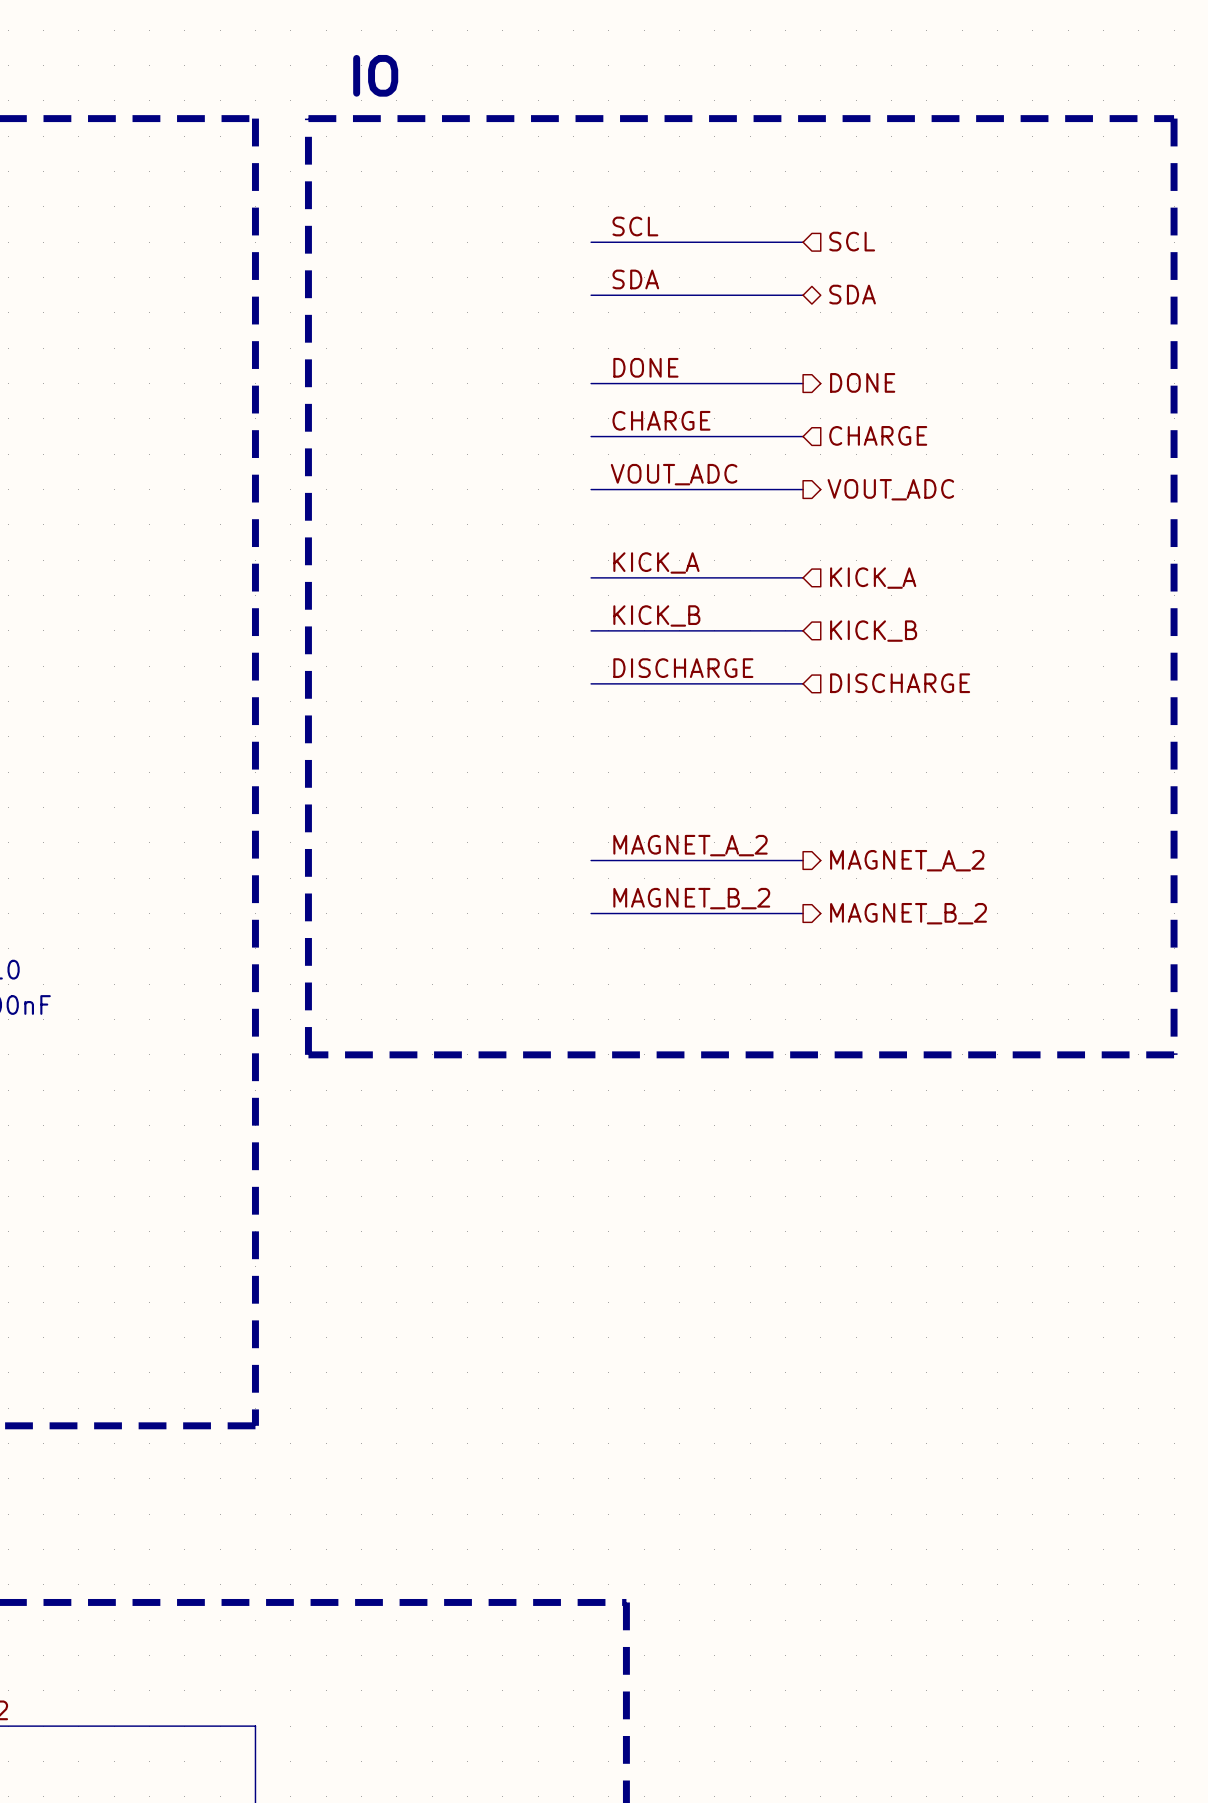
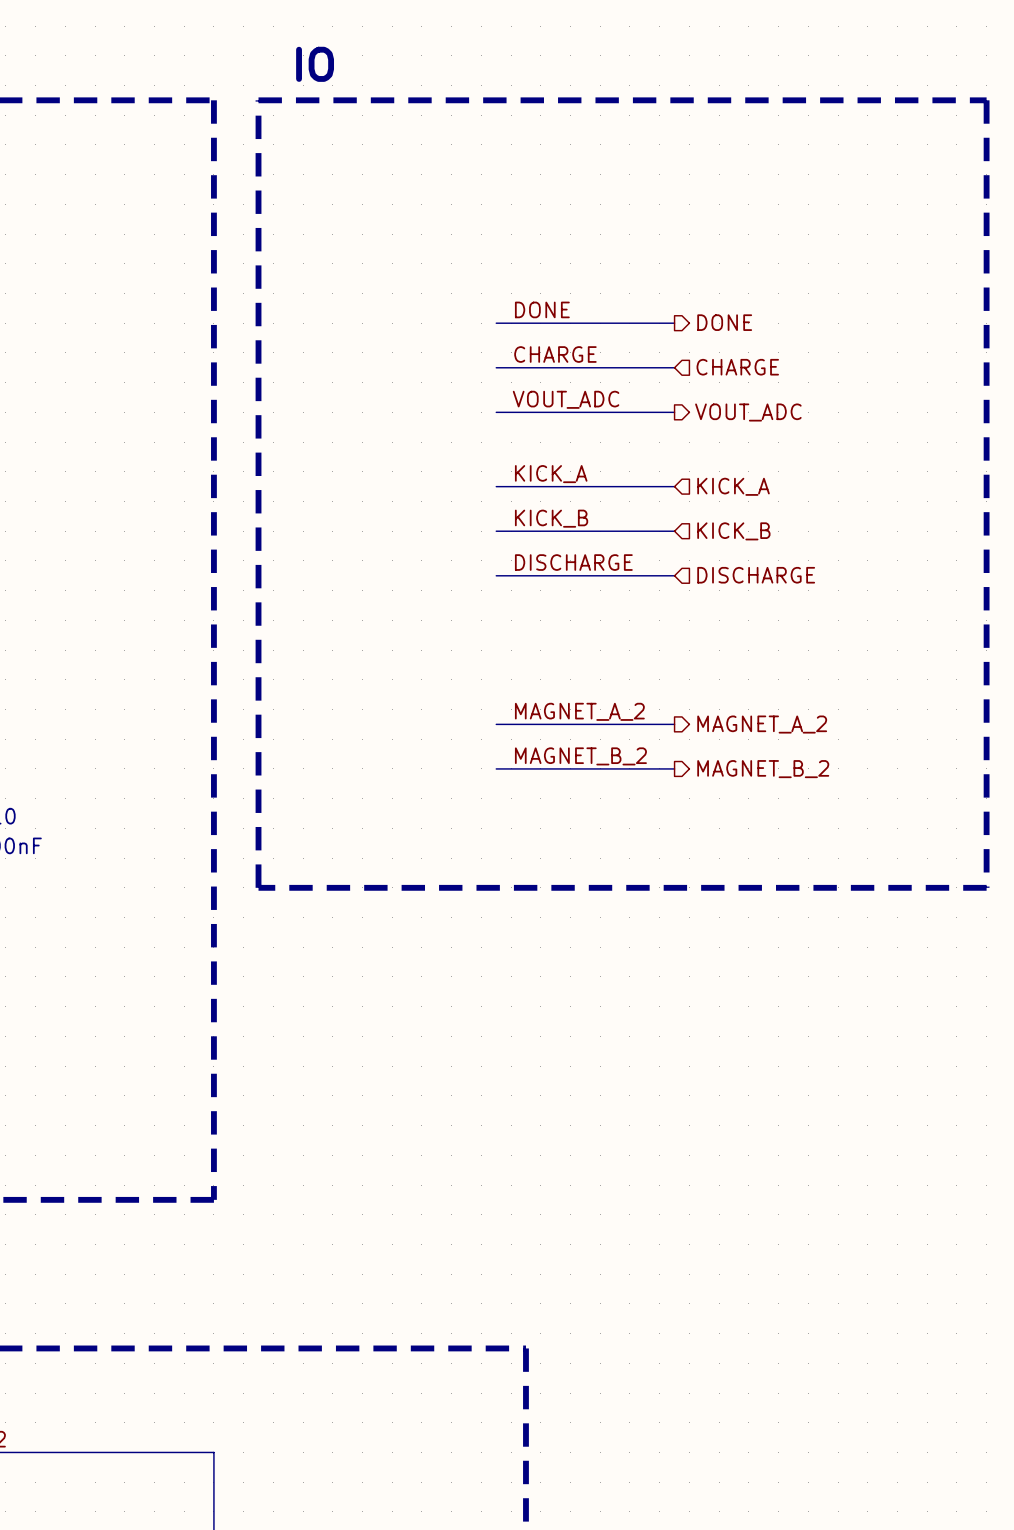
label: SCL (635, 226) -> none
hierarchical label: SCL (852, 241) -> none
wire: (591, 242) (803, 242) -> none
label: SDA (635, 279) -> none
hierarchical label: SDA (852, 294) -> none
wire: (591, 295) (803, 295) -> none

